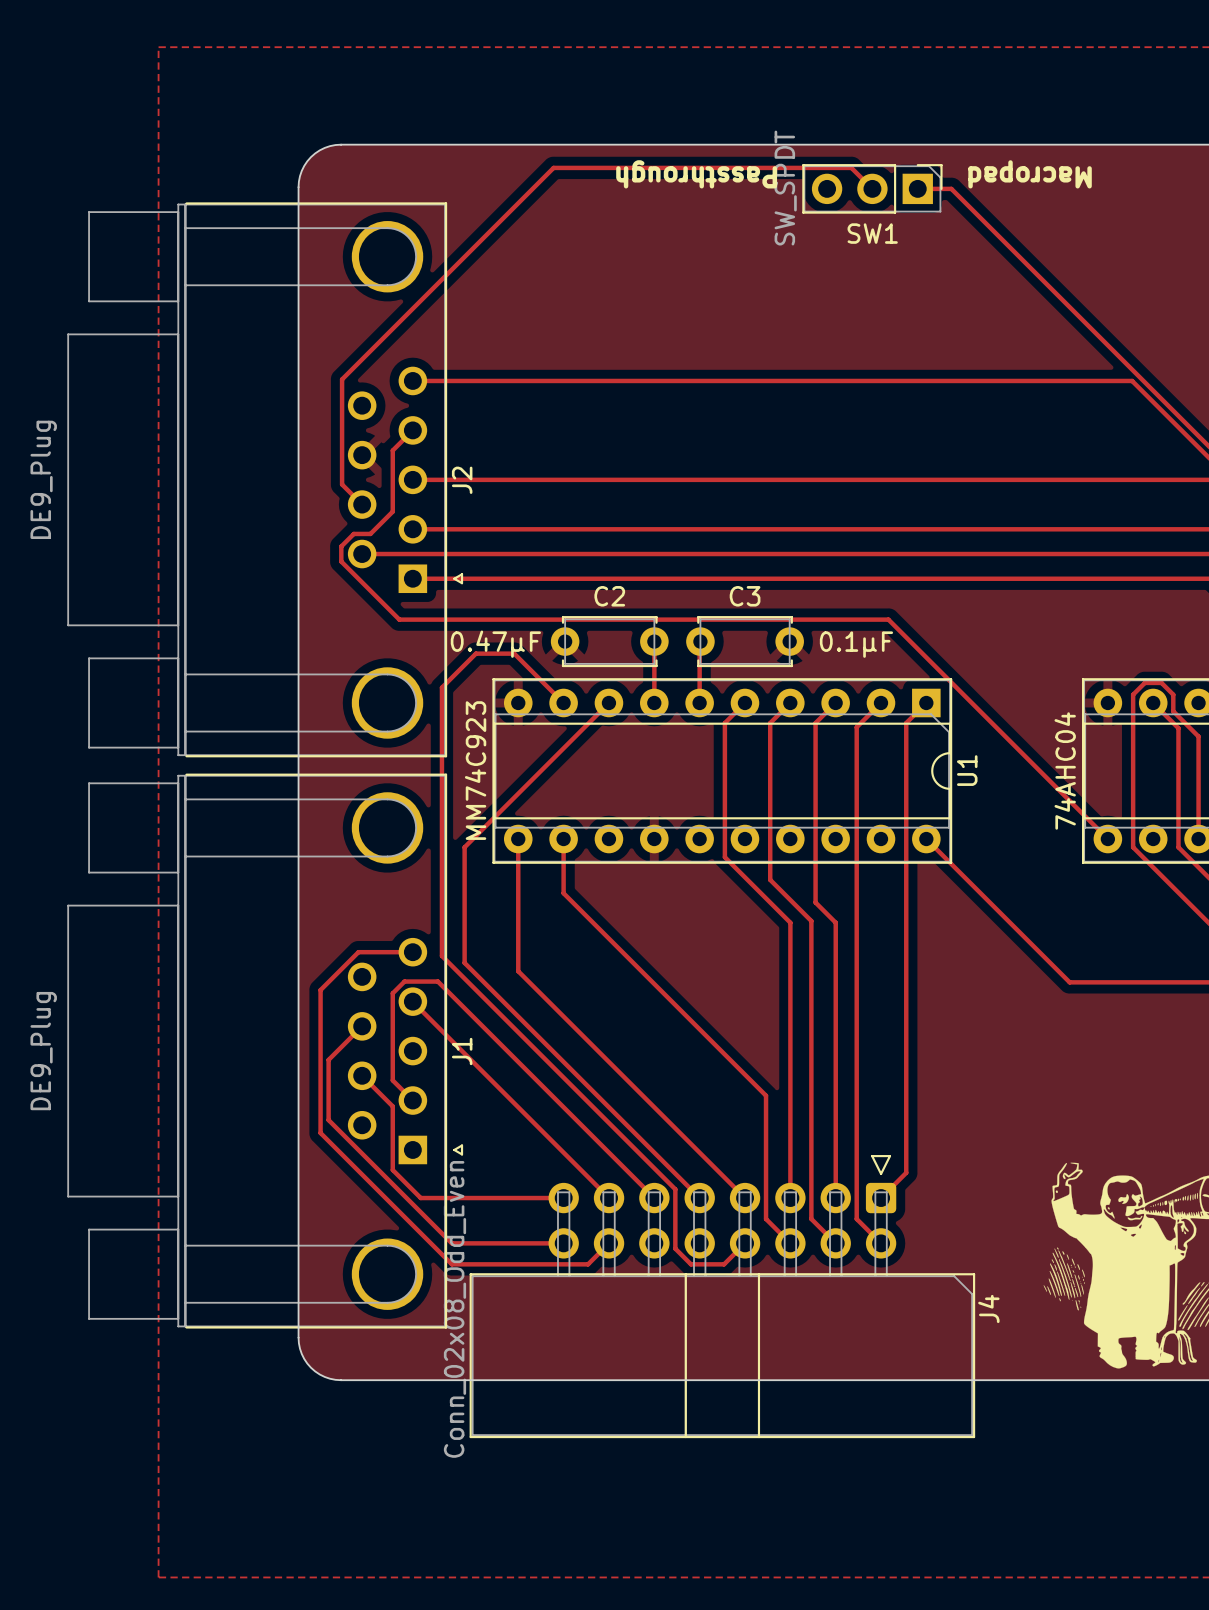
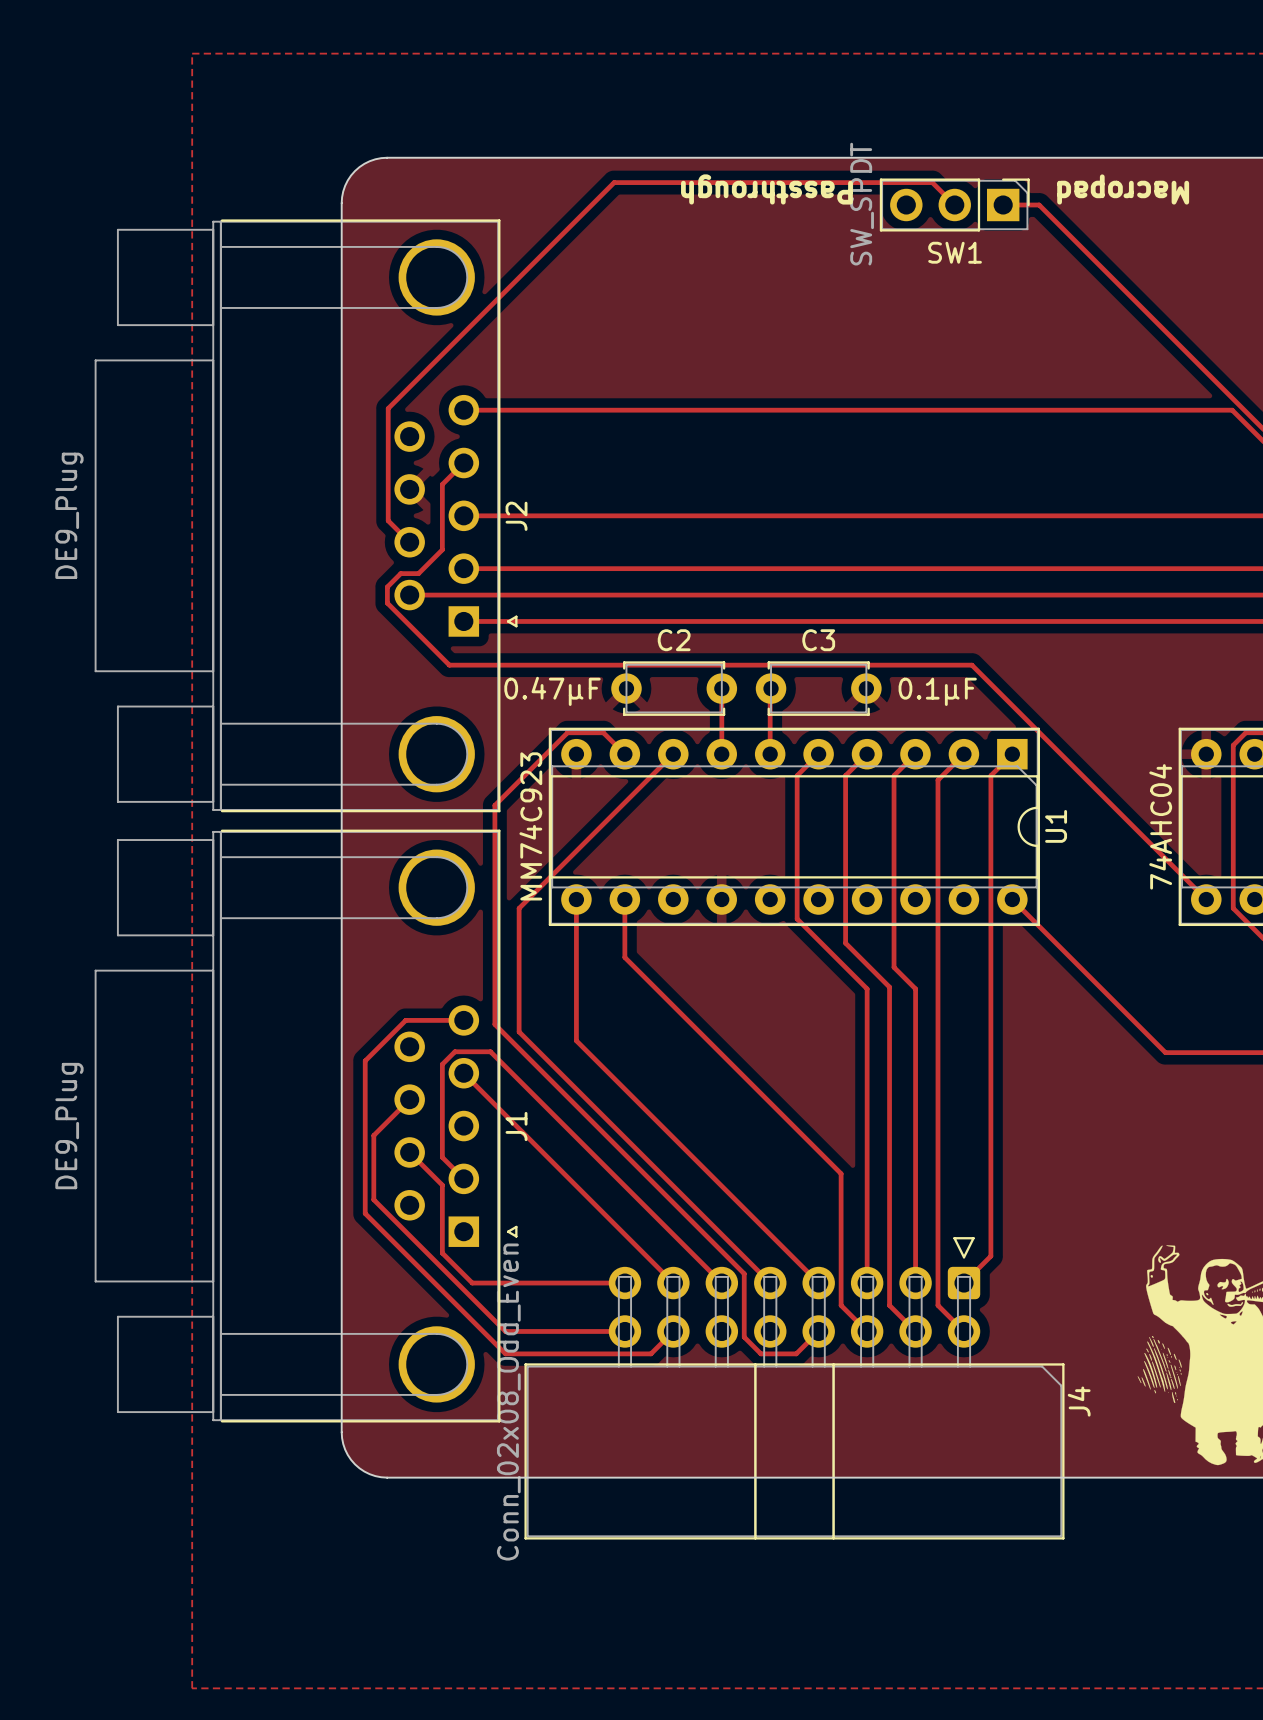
track: (543, 682) (514, 653) (475, 653) (441, 687) (441, 750) -> (603, 732) (567, 732) (494, 805)

